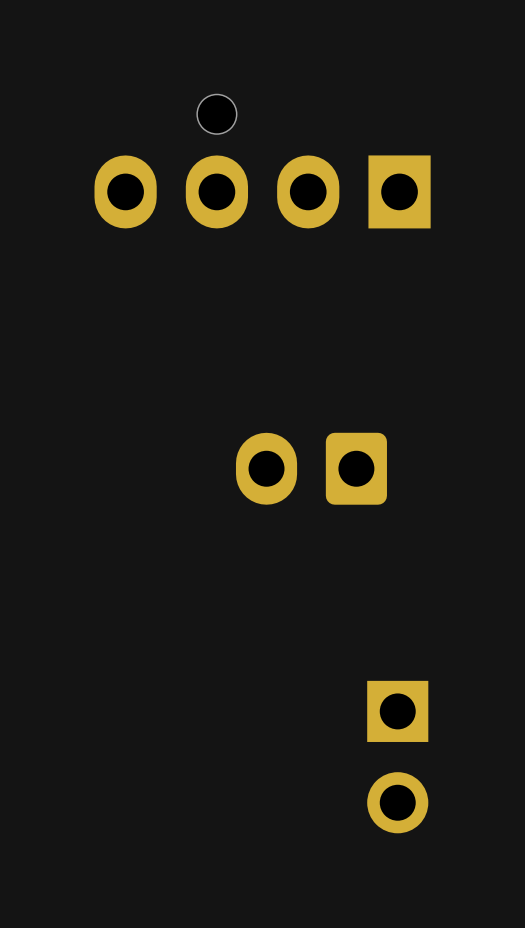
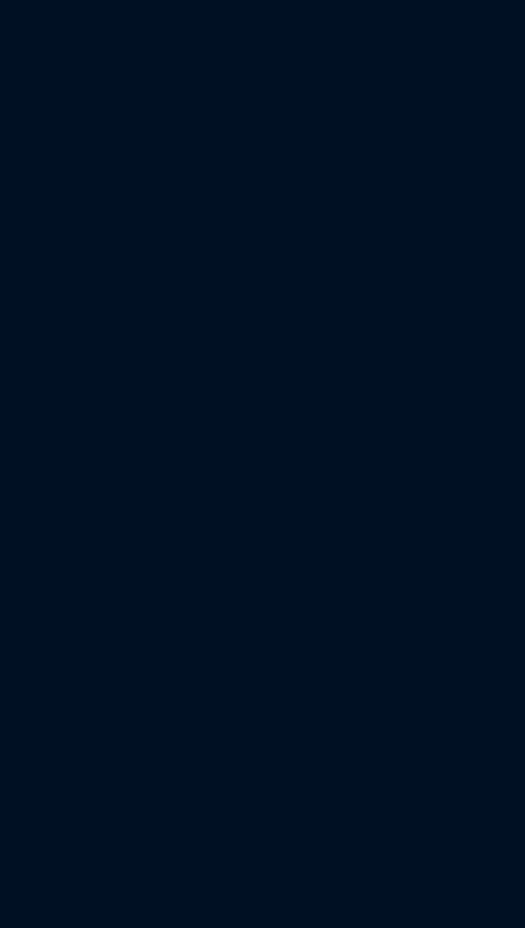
part: (262, 161) -> none
part: (311, 468) -> none
part: (397, 757) -> none

